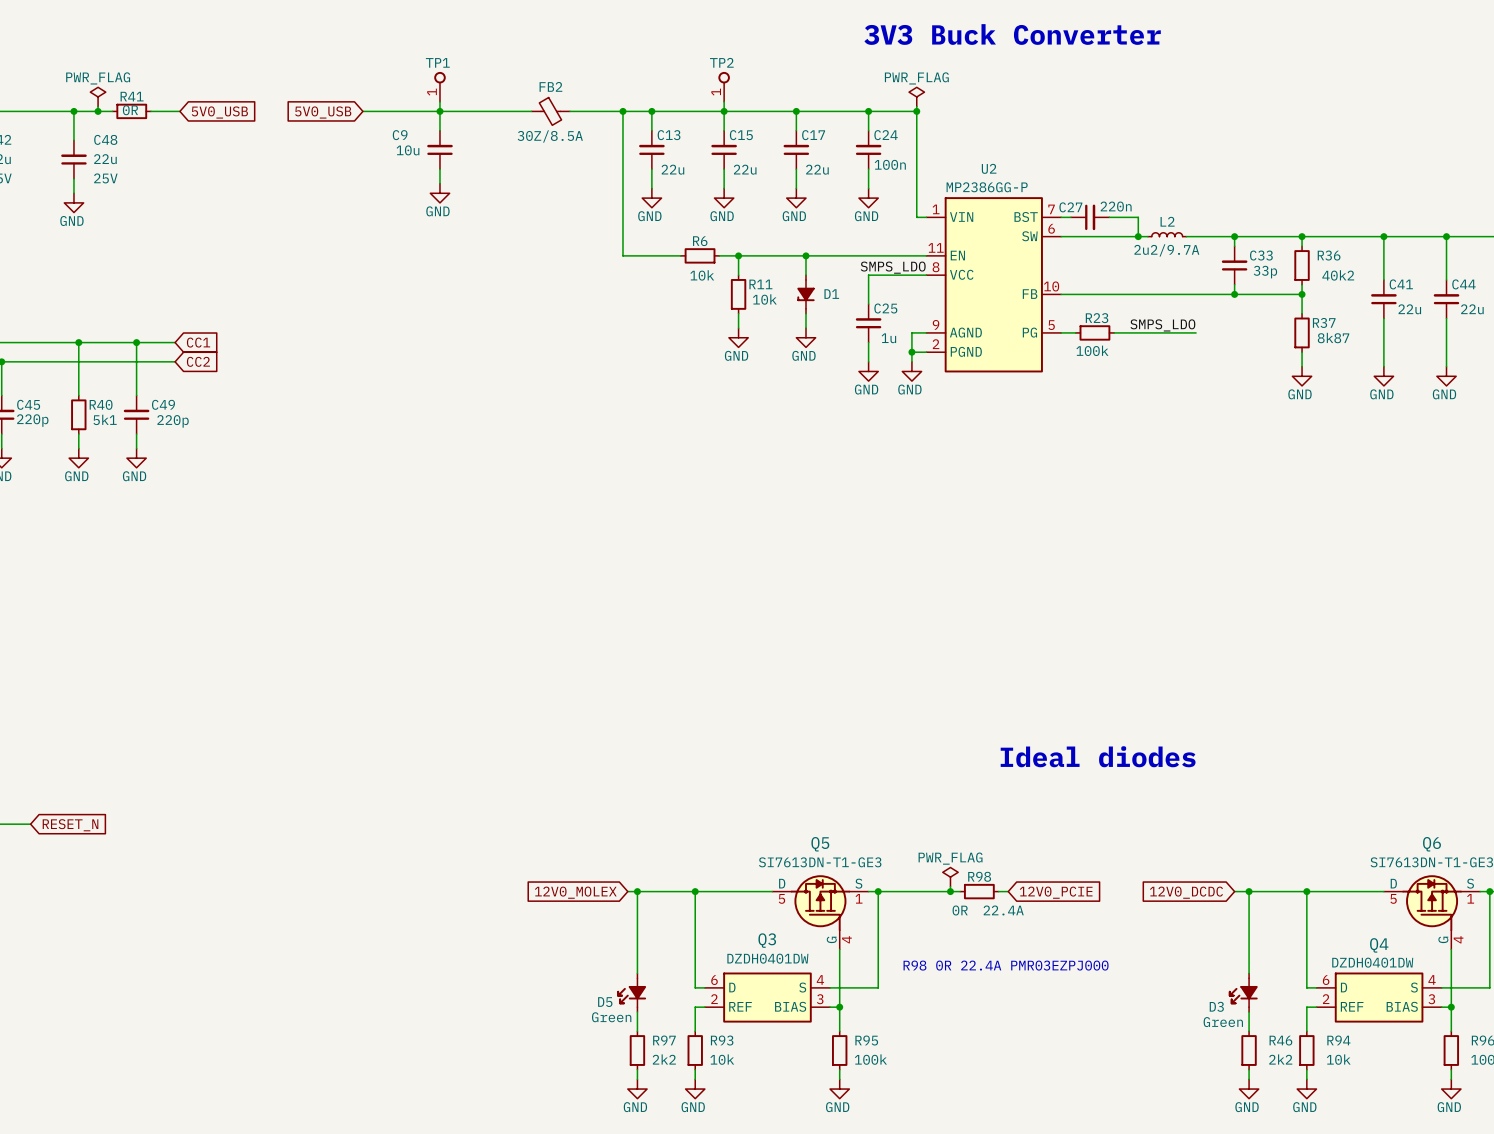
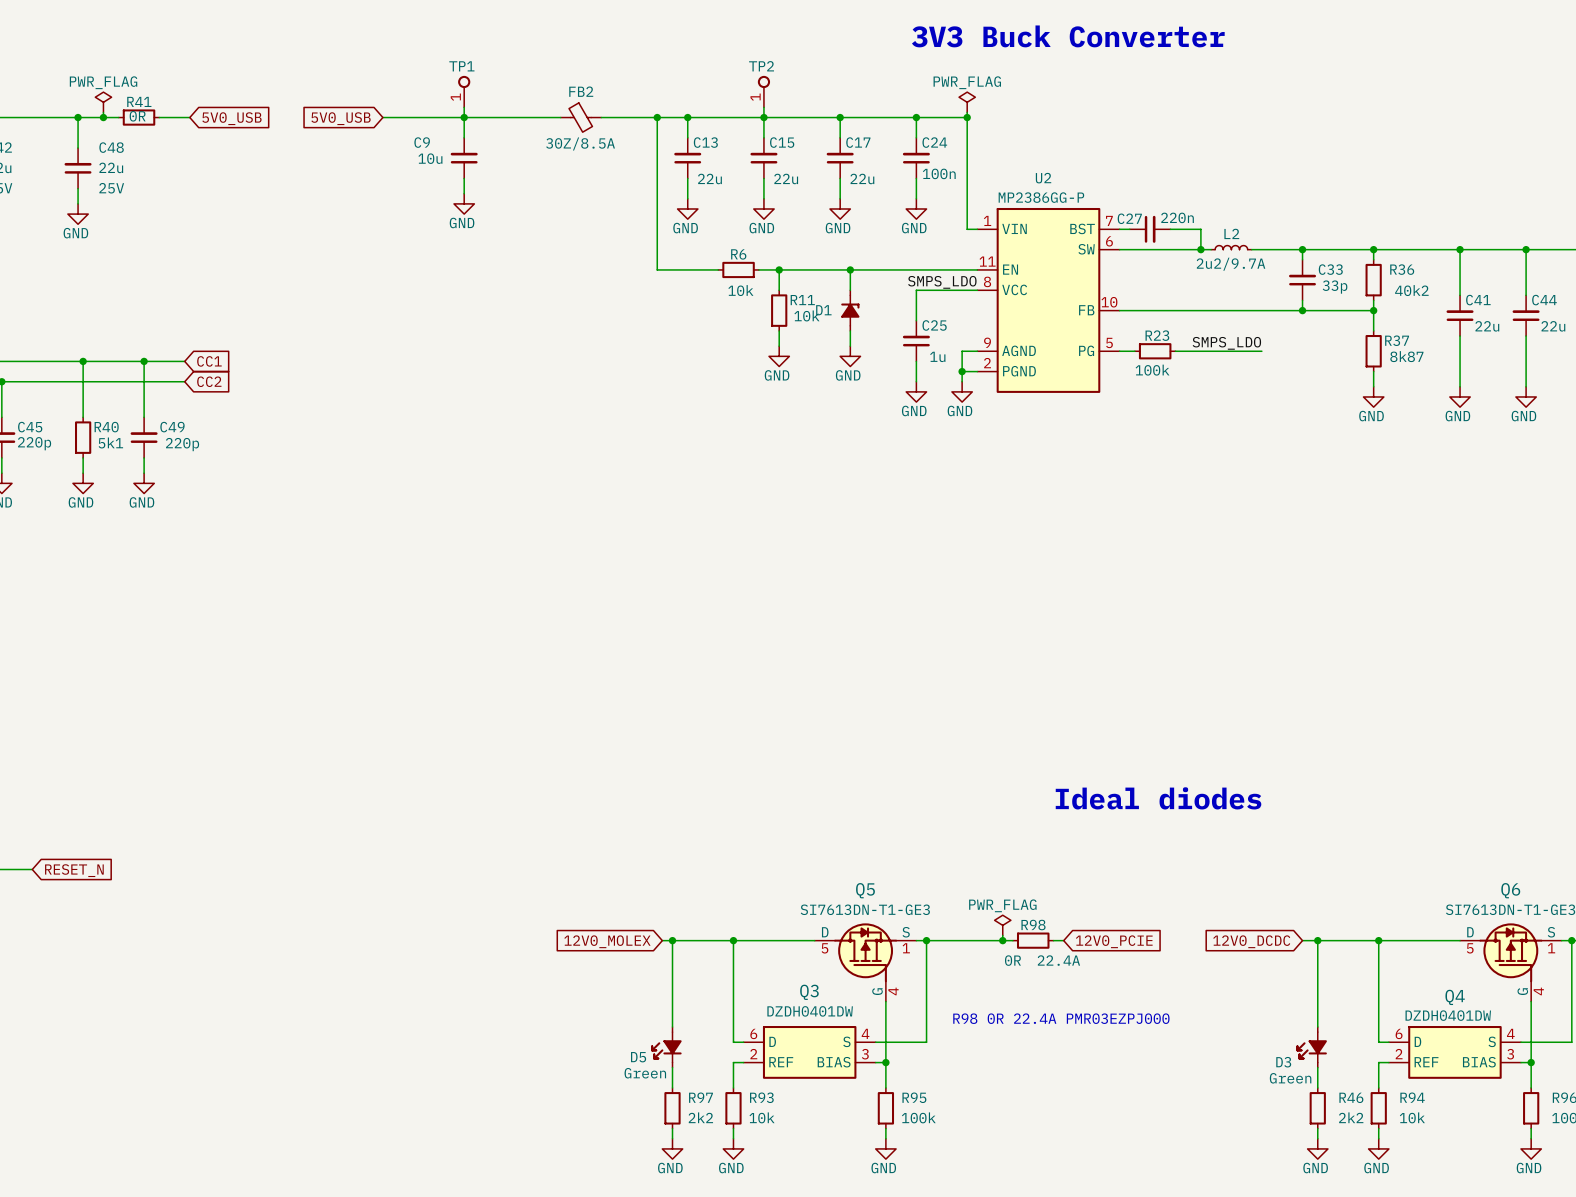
D1 rotation: 0° (805, 294) -> 180° (850, 310)

